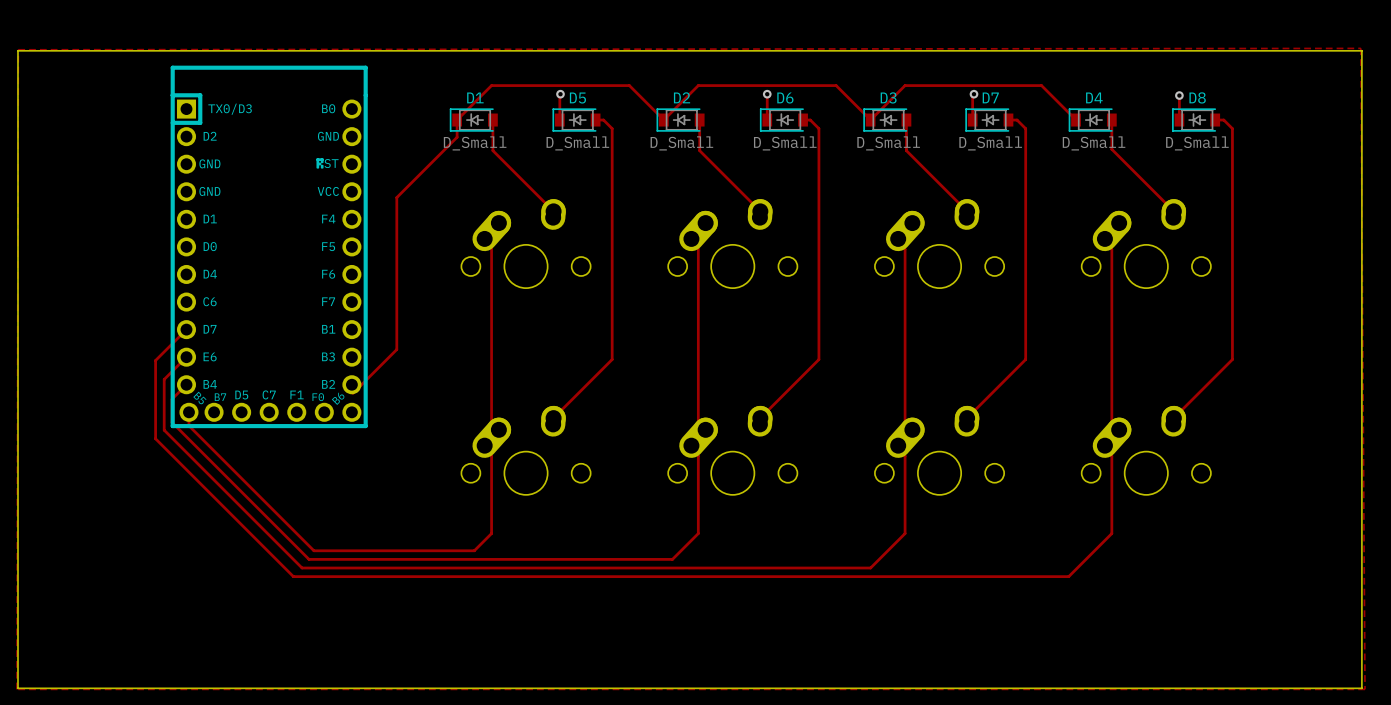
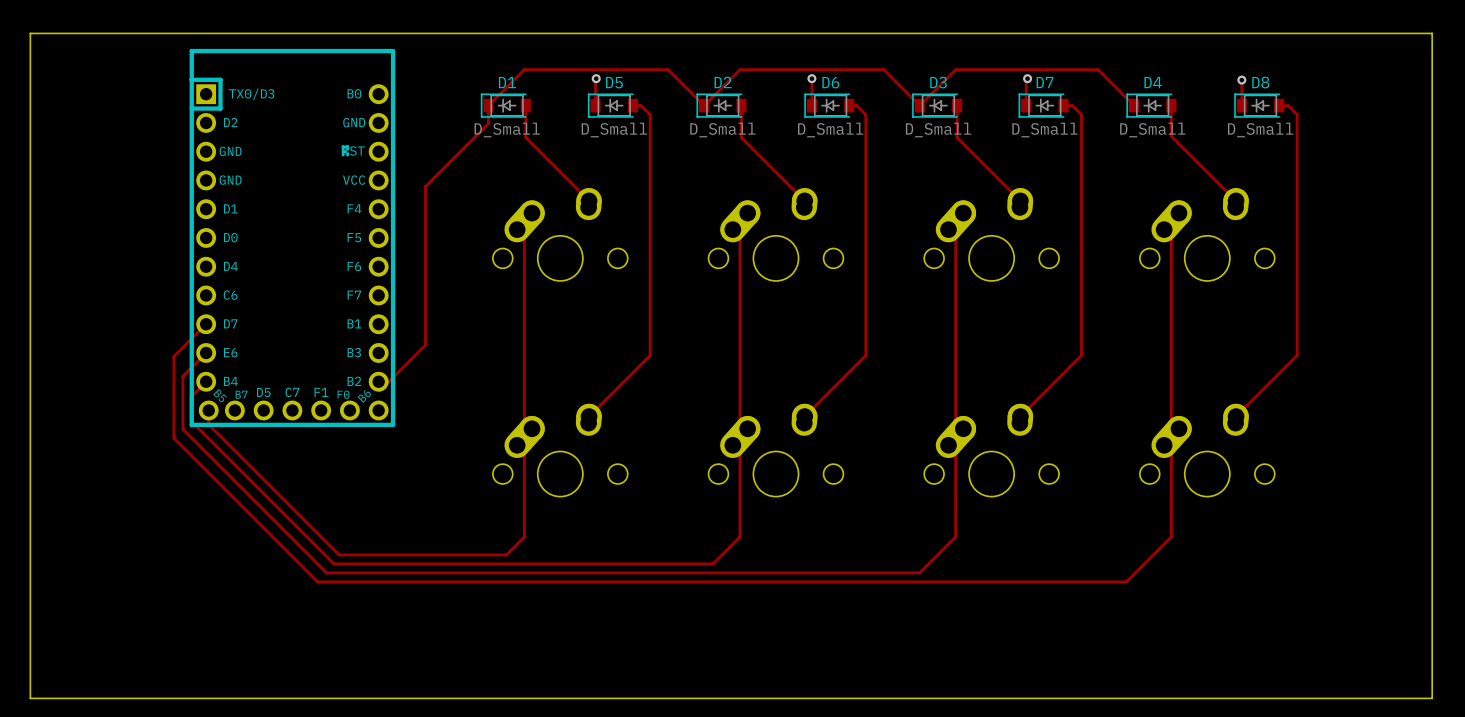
zone outline: (1360, 48) (18, 49) (16, 689) (1365, 689) (1360, 48) -> none

